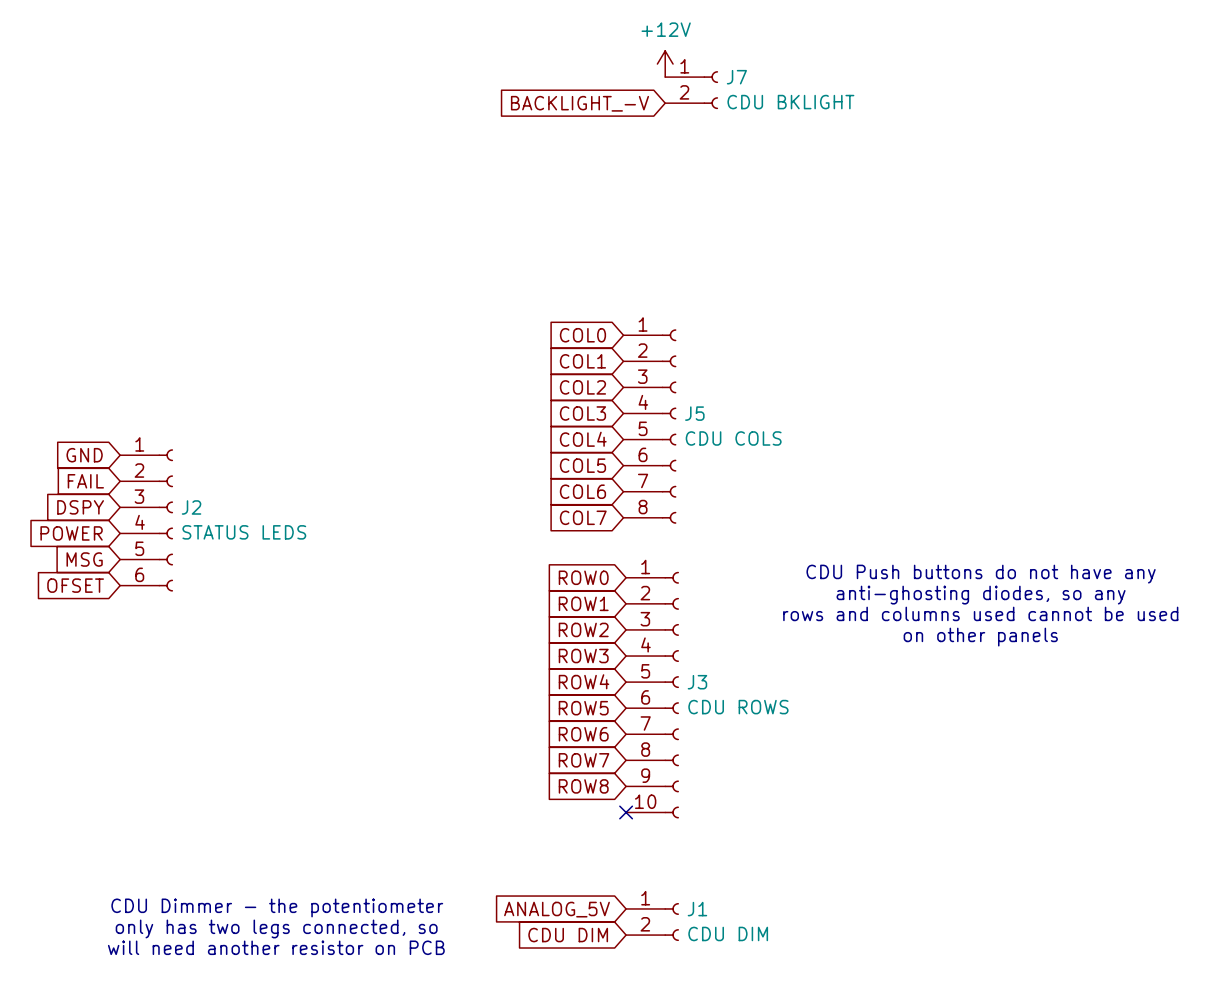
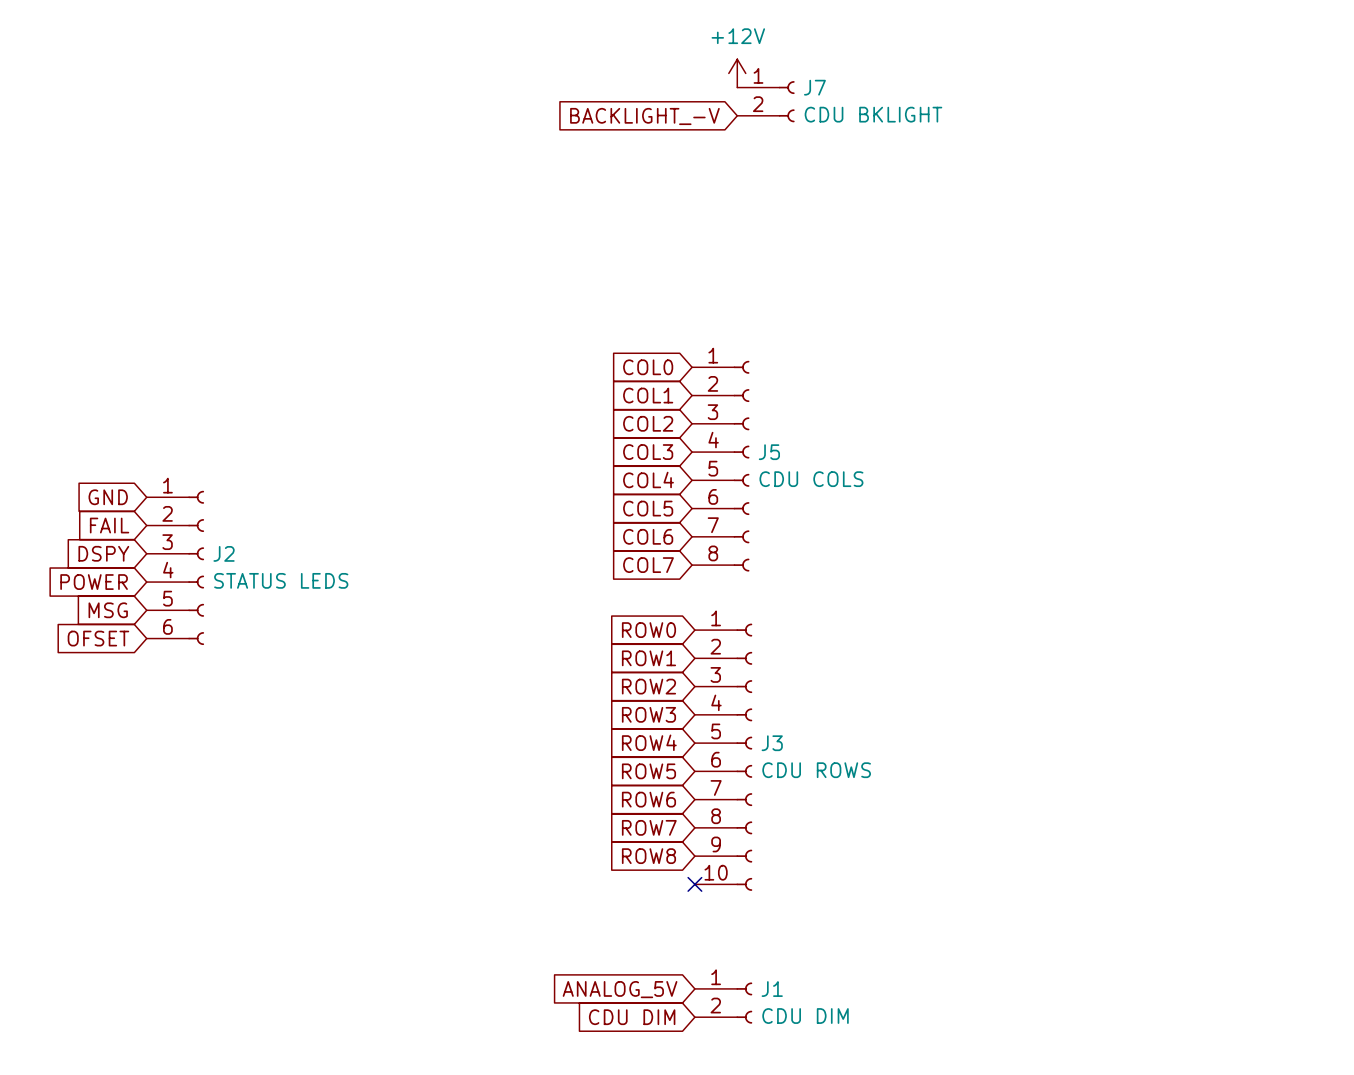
text: CDU Push buttons do not have any (981, 574) -> none
text: anti-ghosting diodes, so any (981, 595) -> none
text: rows and columns used cannot be used (980, 613) -> none
text: on other panels (980, 637) -> none
text: CDU Dimmer - the potentiometer (277, 907) -> none
text: only has two legs connected, so (276, 928) -> none
text: will need another resistor on PCB (276, 947) -> none

